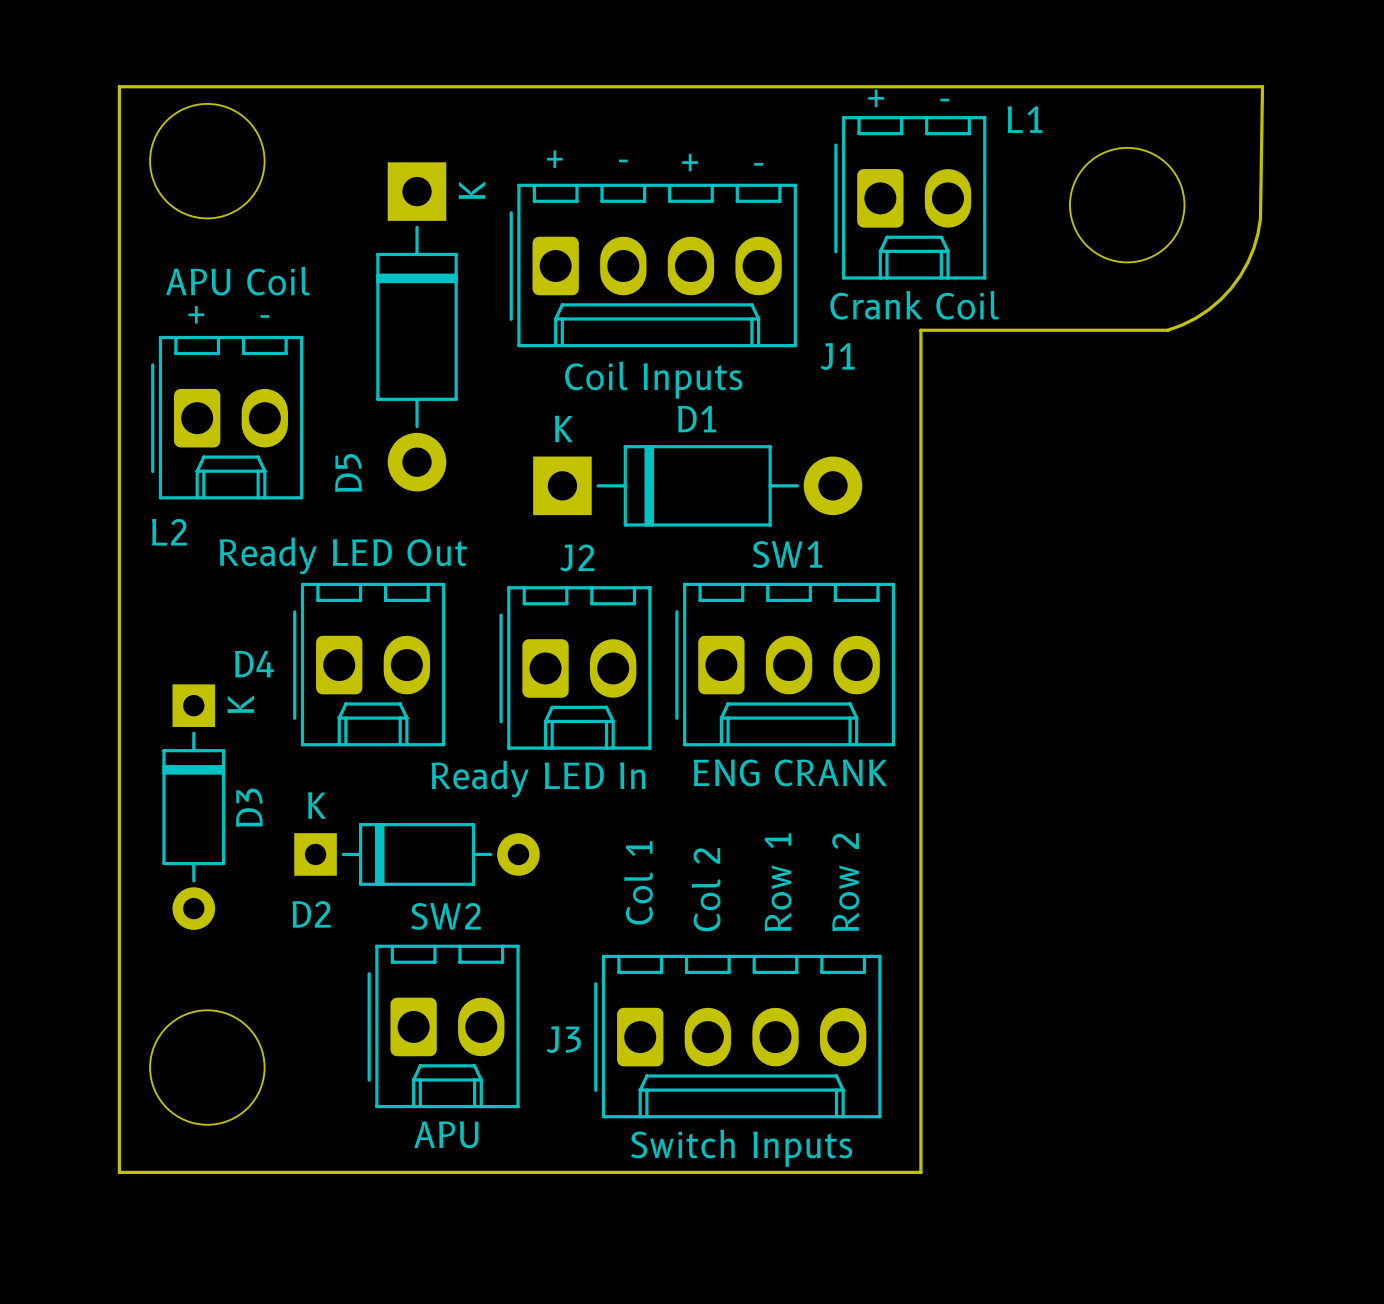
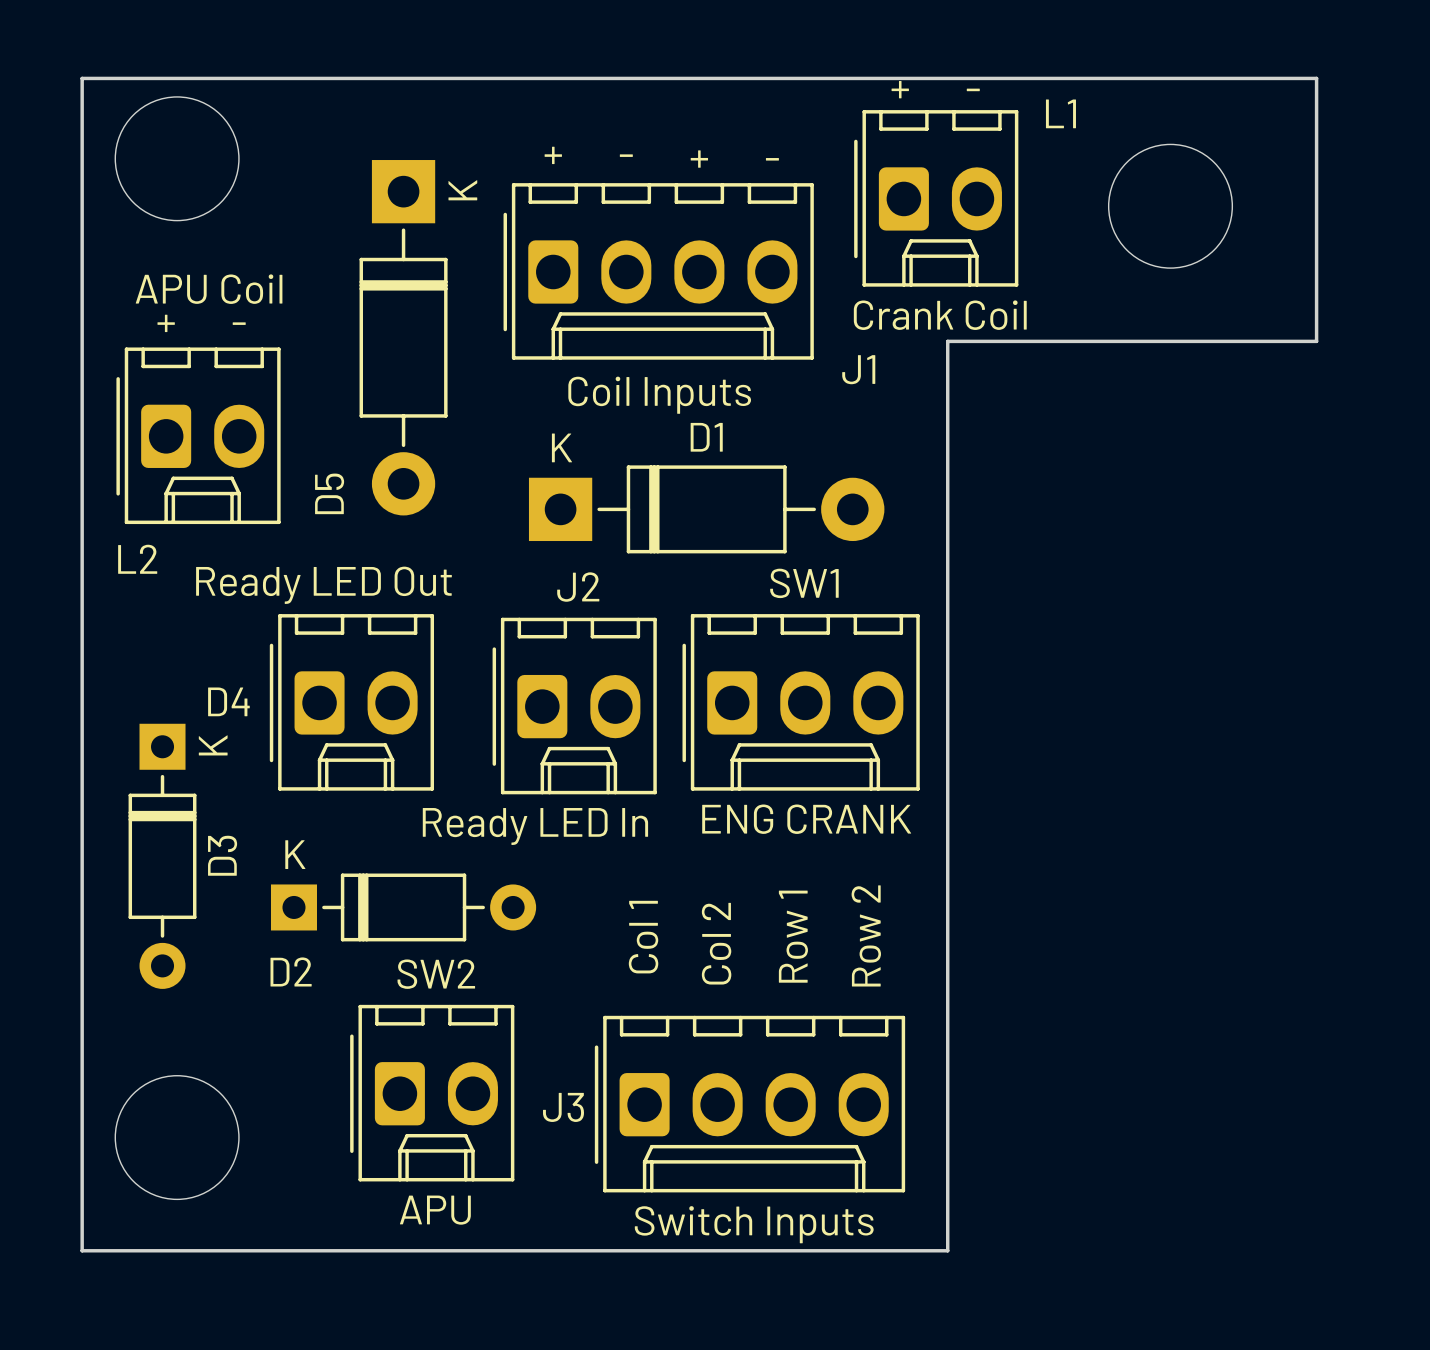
board edge: (1262, 86) (1260, 218) (1253, 248) (1240, 276) (1220, 299) (1196, 318) (1167, 330) -> (1316, 78) (1316, 341) (1214, 341)

